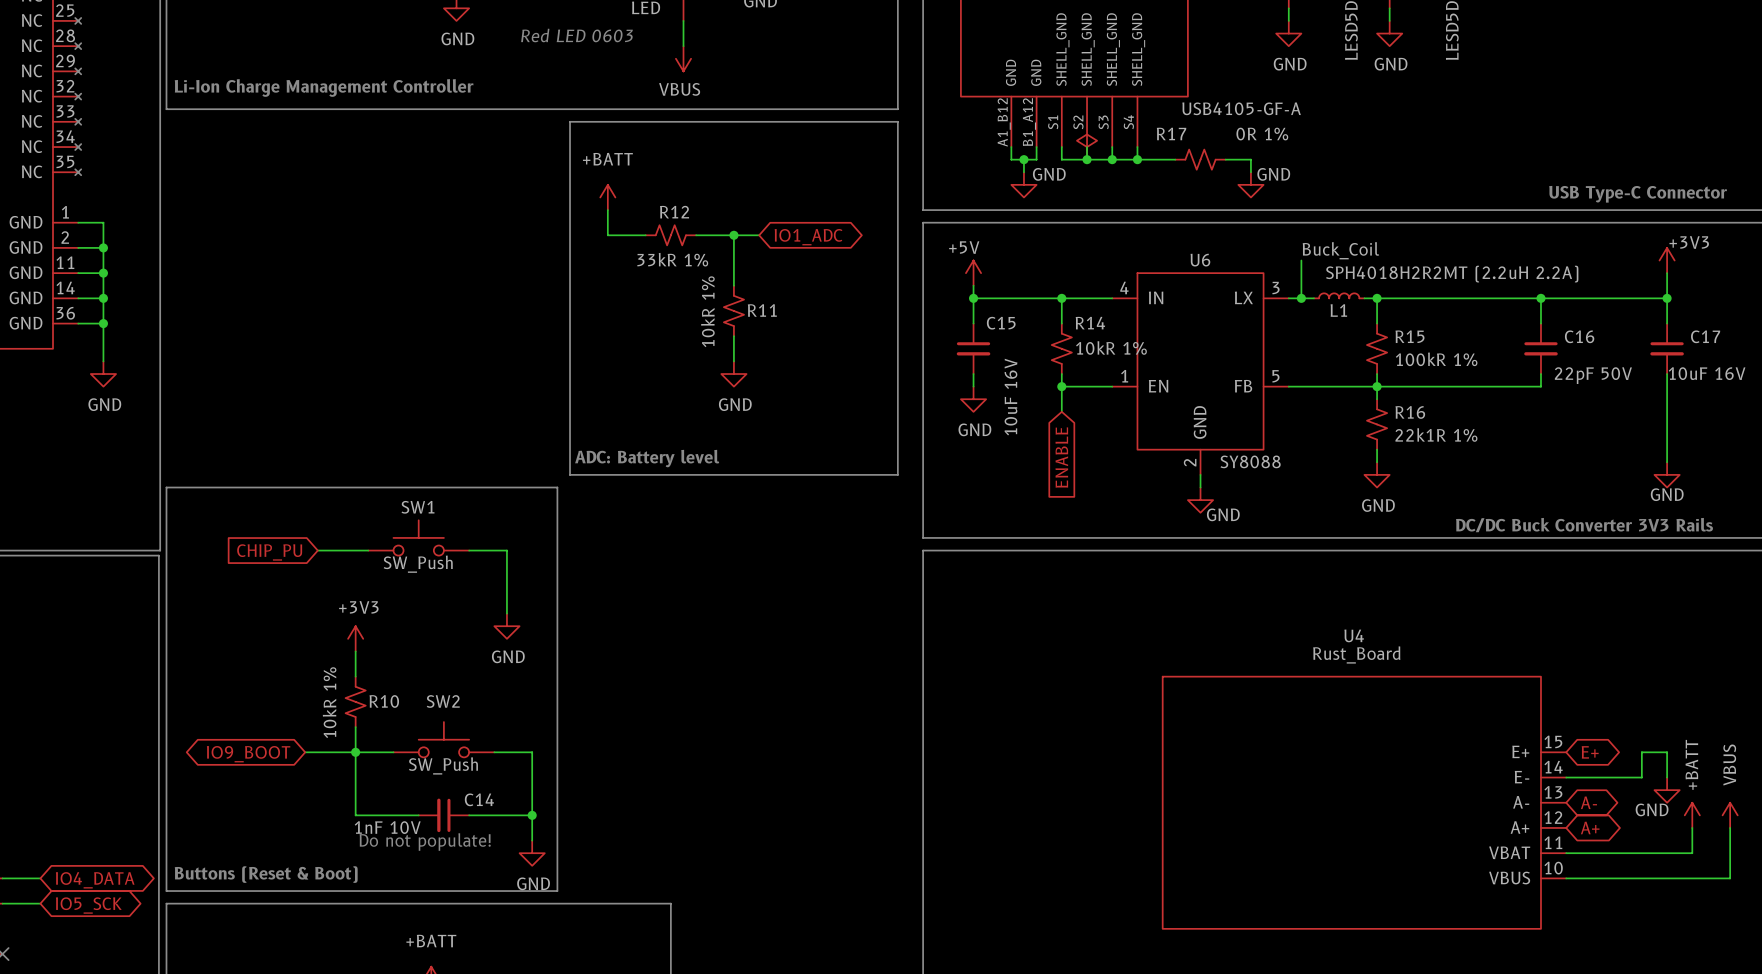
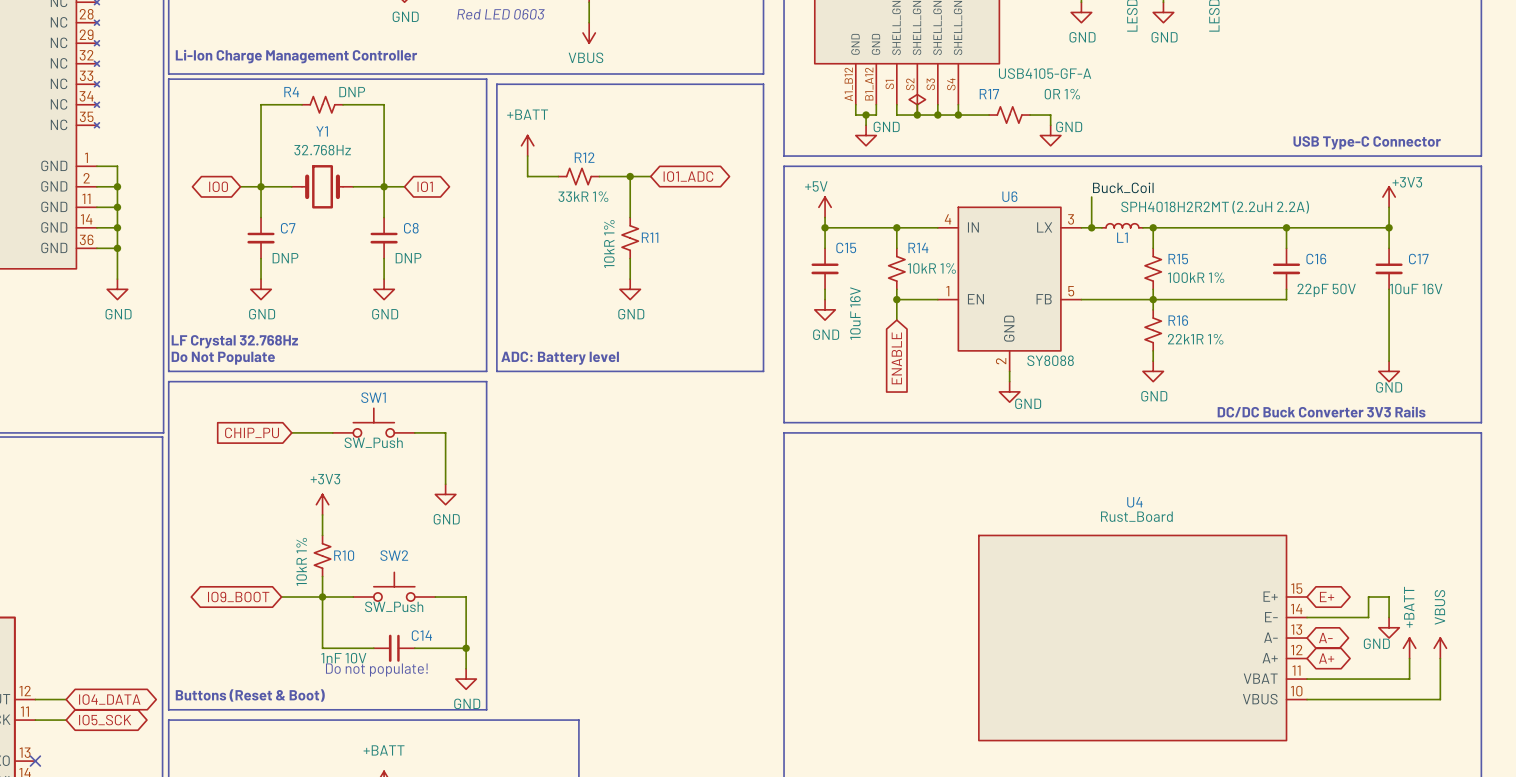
line: none -> (168, 79) (168, 371) (486, 371) (486, 79) (168, 79)
wire: none -> (302, 104) (261, 104) (261, 217)
R4: none -> DNP (322, 104)
wire: none -> (343, 104) (384, 104) (384, 217)
global label: none -> IO0 (218, 186)
wire: none -> (240, 186) (291, 186)
junction: none -> (261, 186)
Y1: none -> 32.768Hz (322, 186)
wire: none -> (353, 186) (404, 186)
junction: none -> (384, 186)
global label: none -> IO1 (425, 186)
C7: none -> DNP (261, 238)
C8: none -> DNP (384, 238)
wire: none -> (261, 258) (261, 279)
wire: none -> (384, 258) (384, 279)
power symbol: none -> GND (261, 289)
power symbol: none -> GND (384, 289)
text: none -> LF Crystal 32.768Hz (234, 341)
text: none -> Do Not Populate (223, 358)

